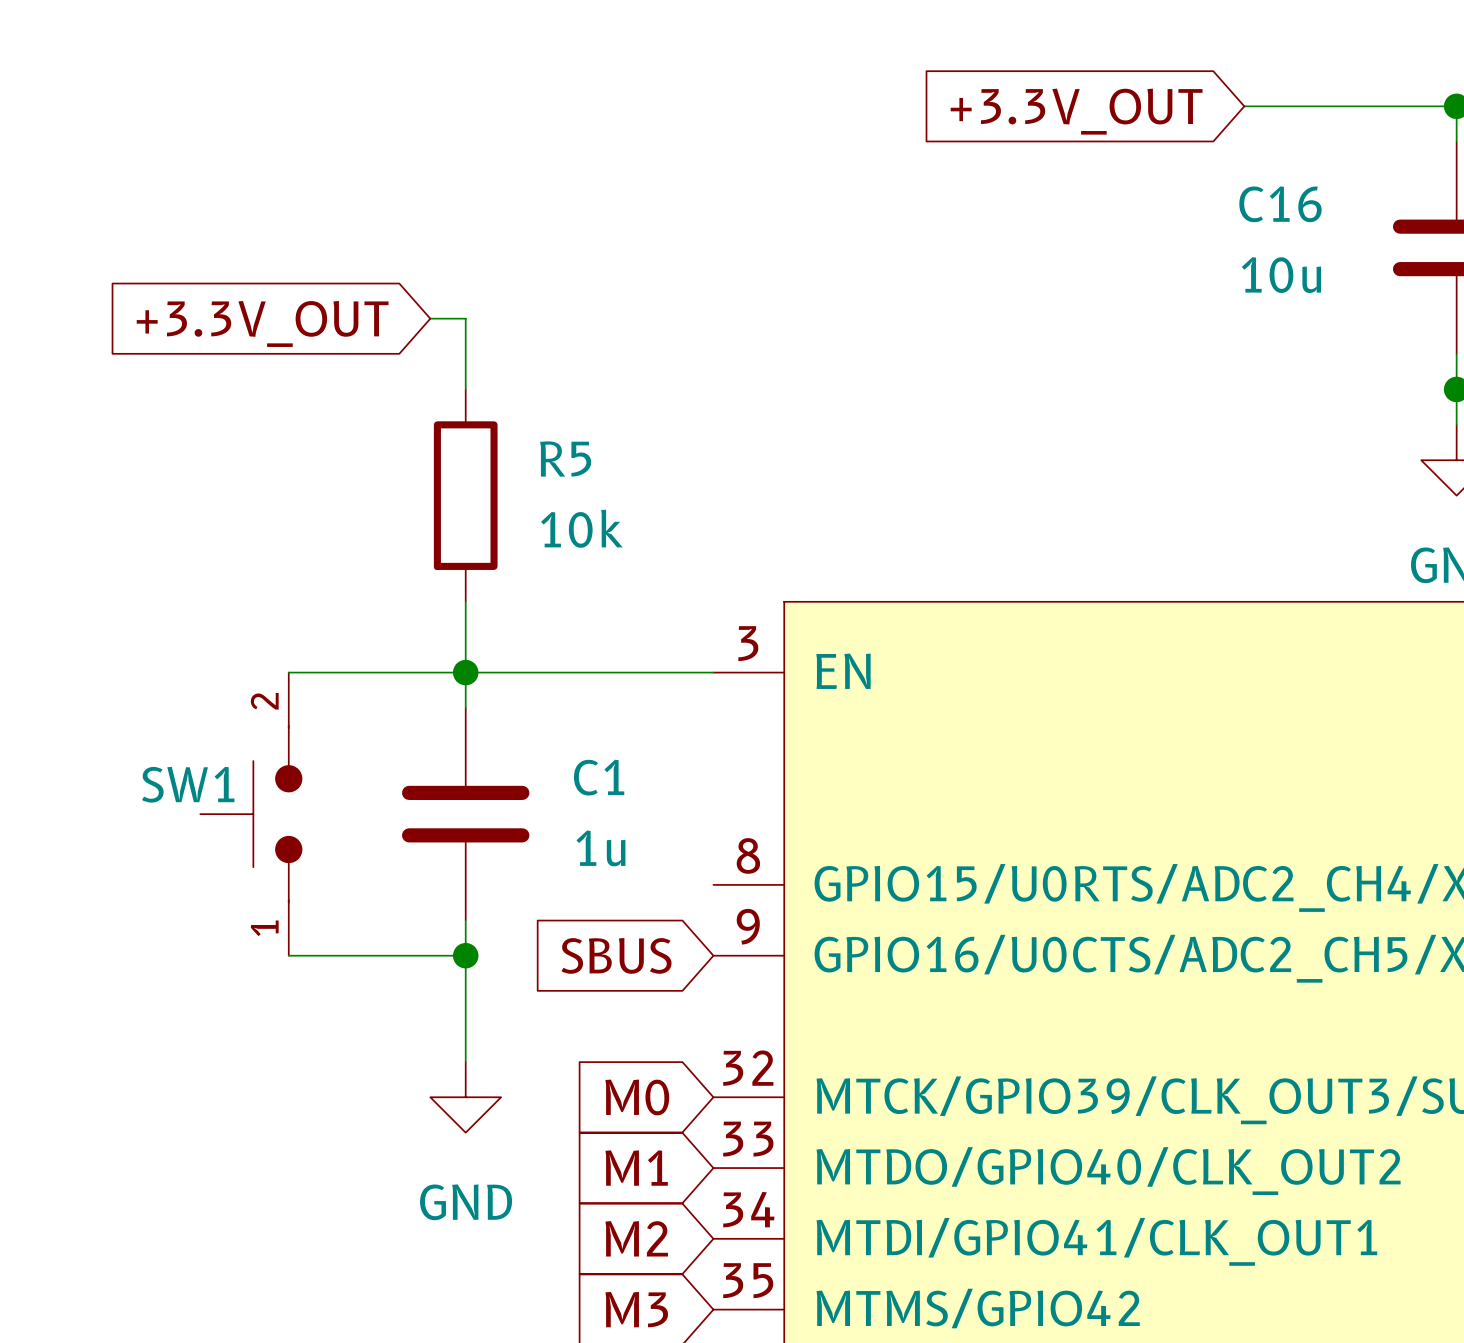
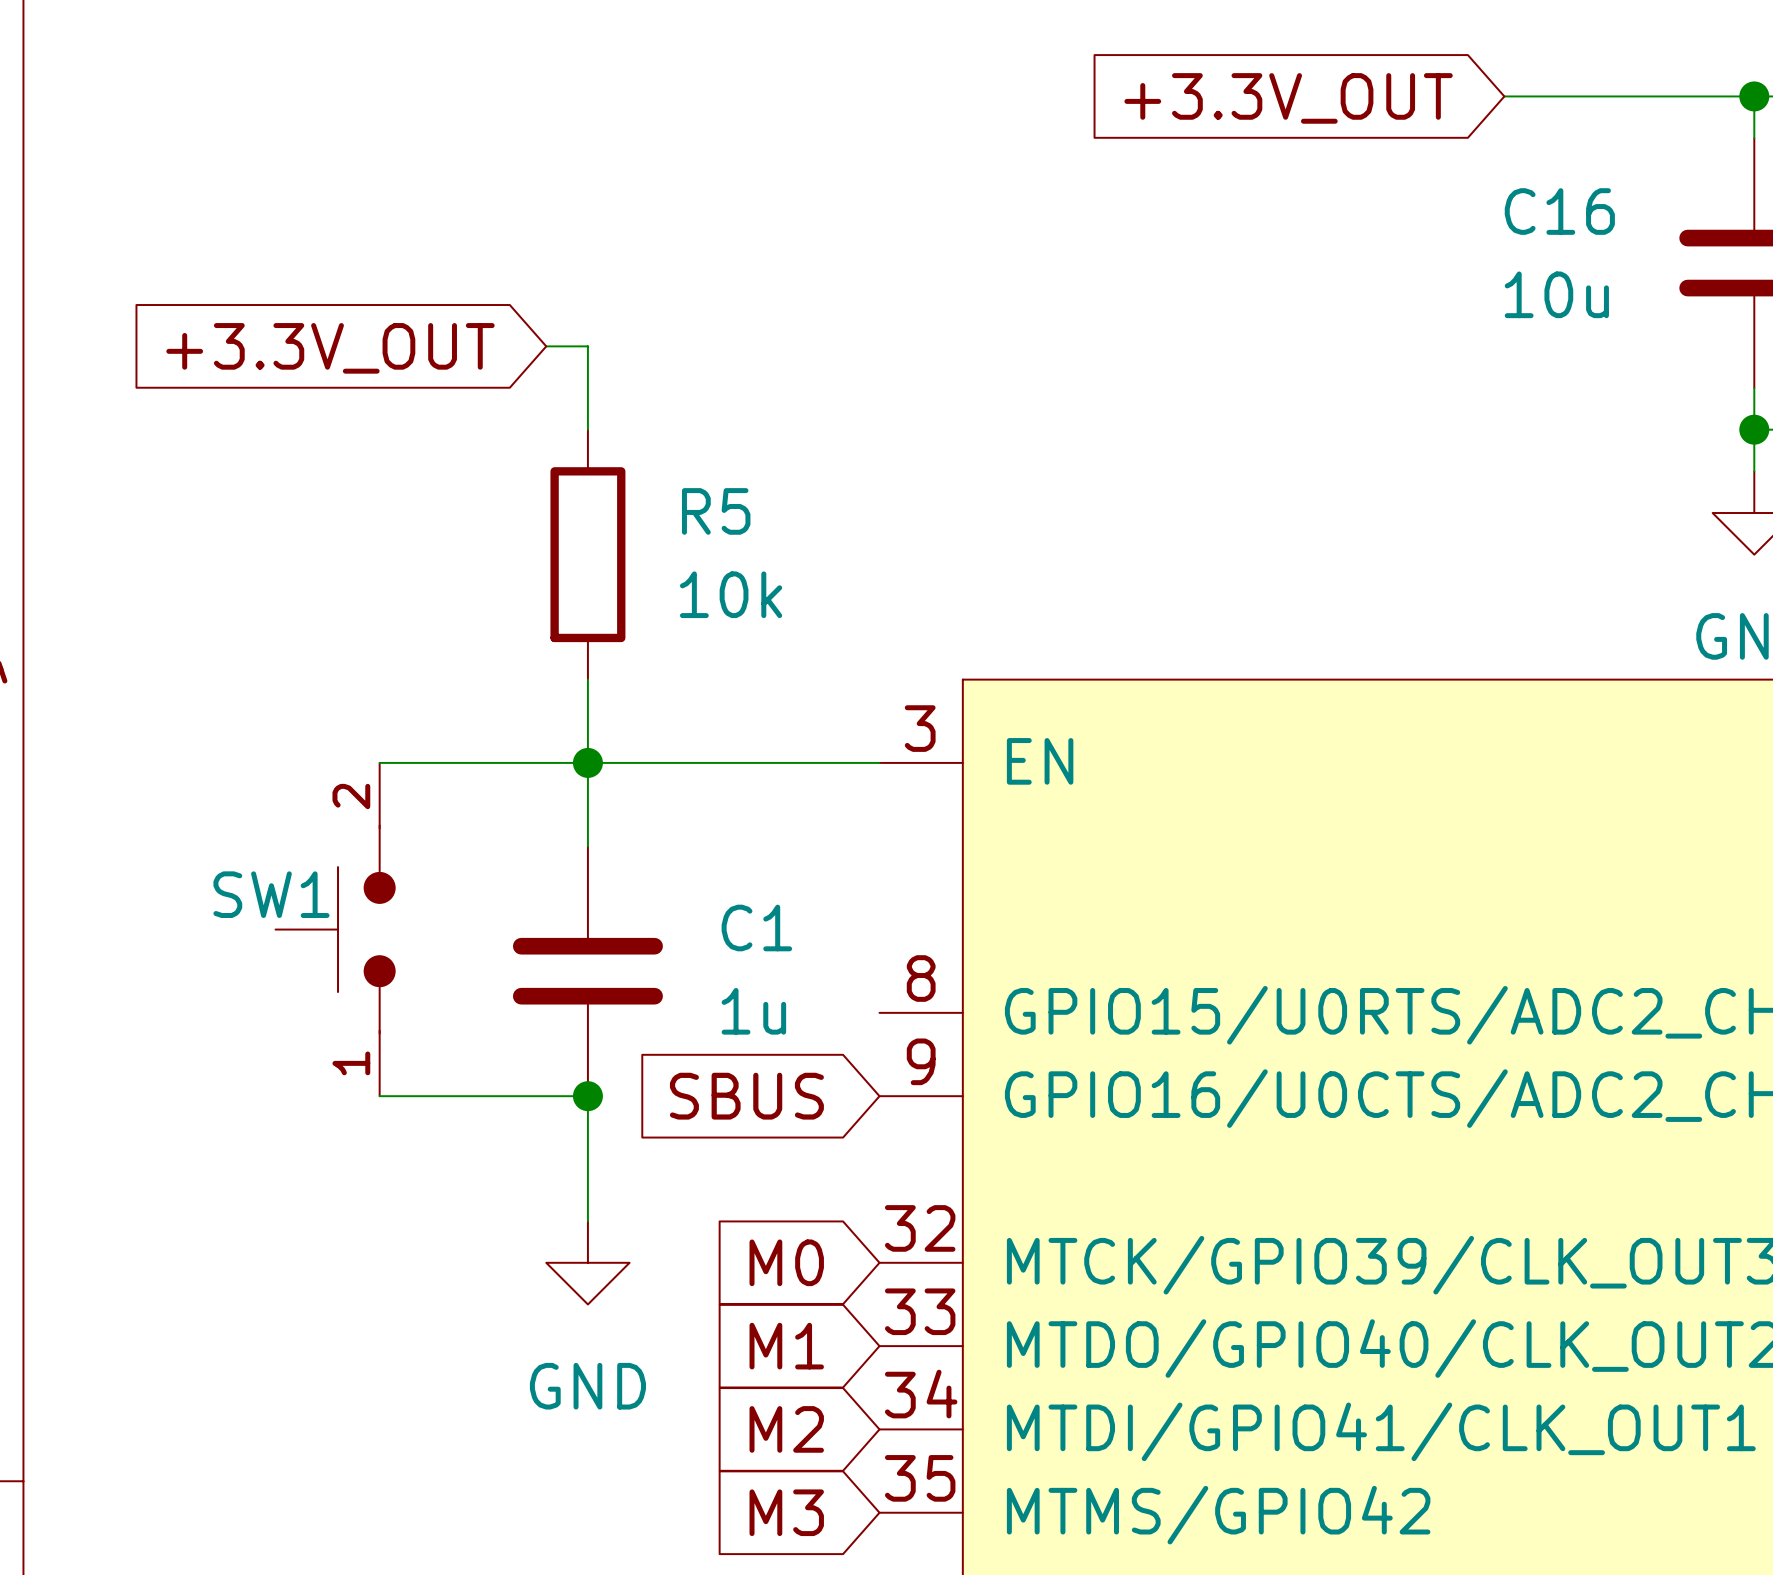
C1 position: (465, 814) -> (587, 971)

